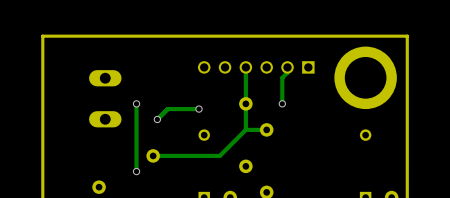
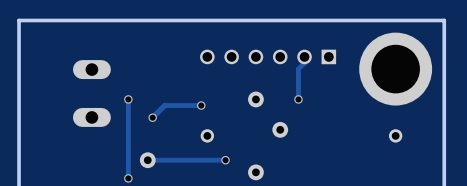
track: (245, 67) (245, 129) -> none
track: (245, 129) (219, 155) -> none
track: (266, 129) (245, 129) -> none
via: none -> (225, 160)

